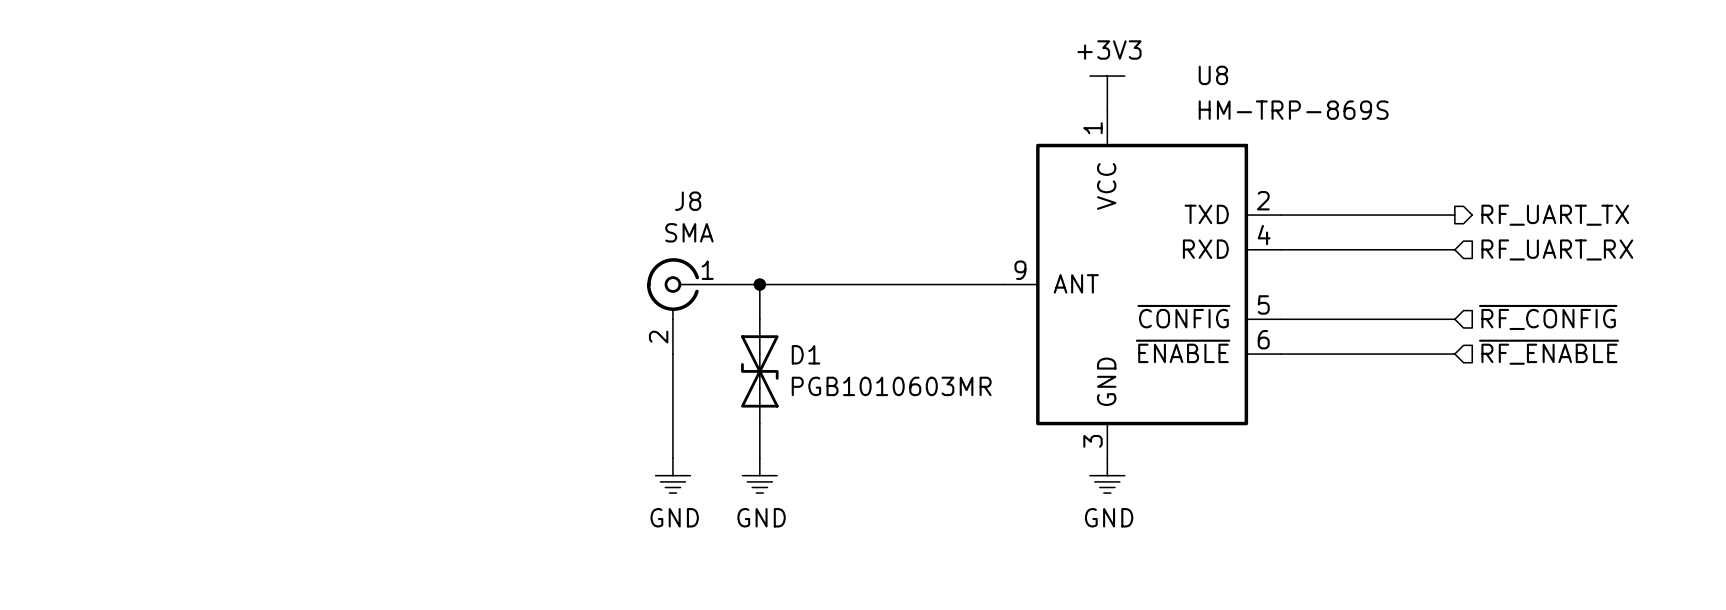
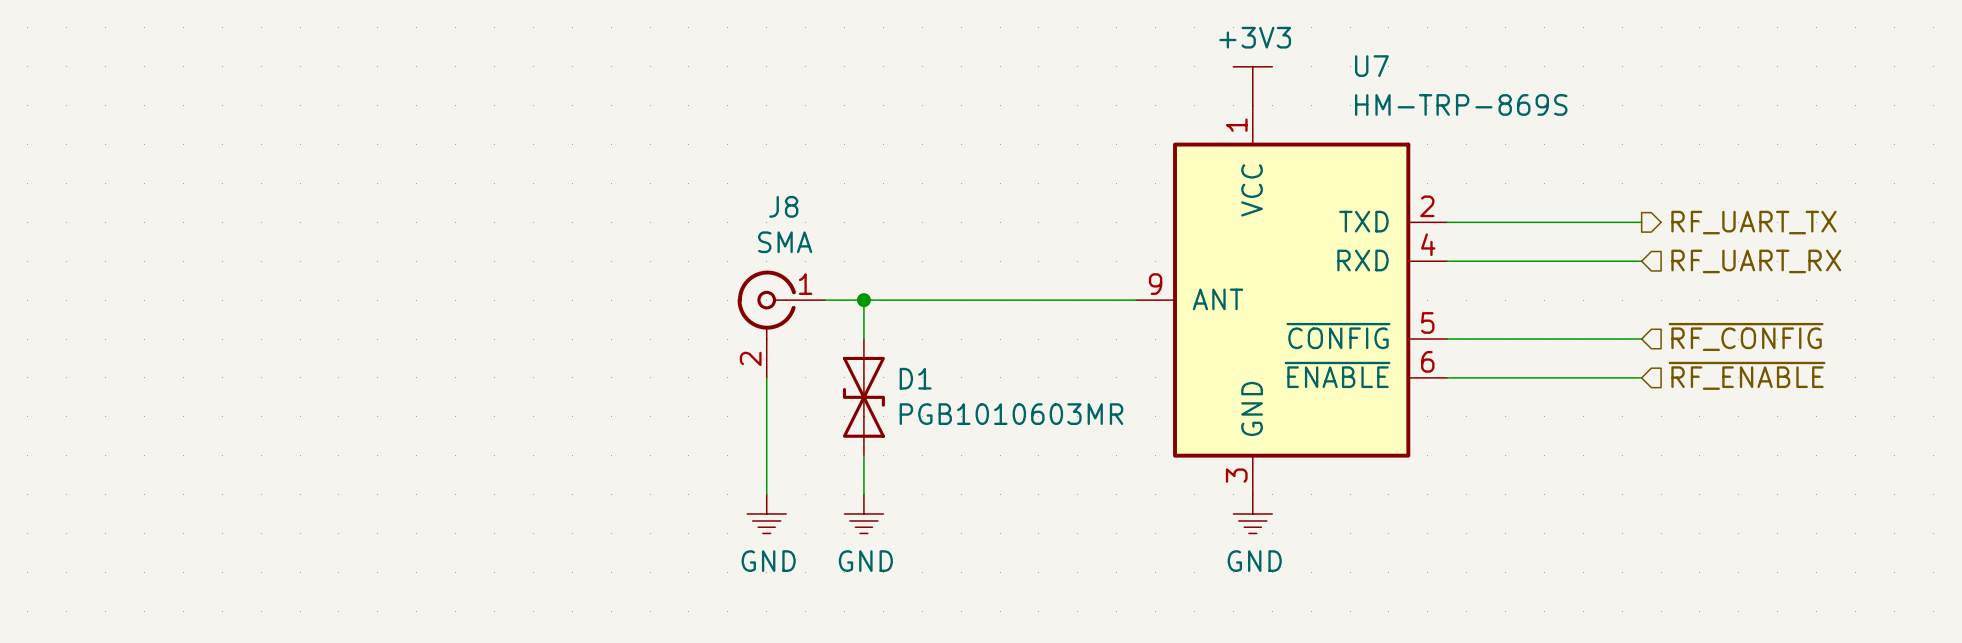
U8 name: U8 (1213, 75) -> U7 (1371, 66)

